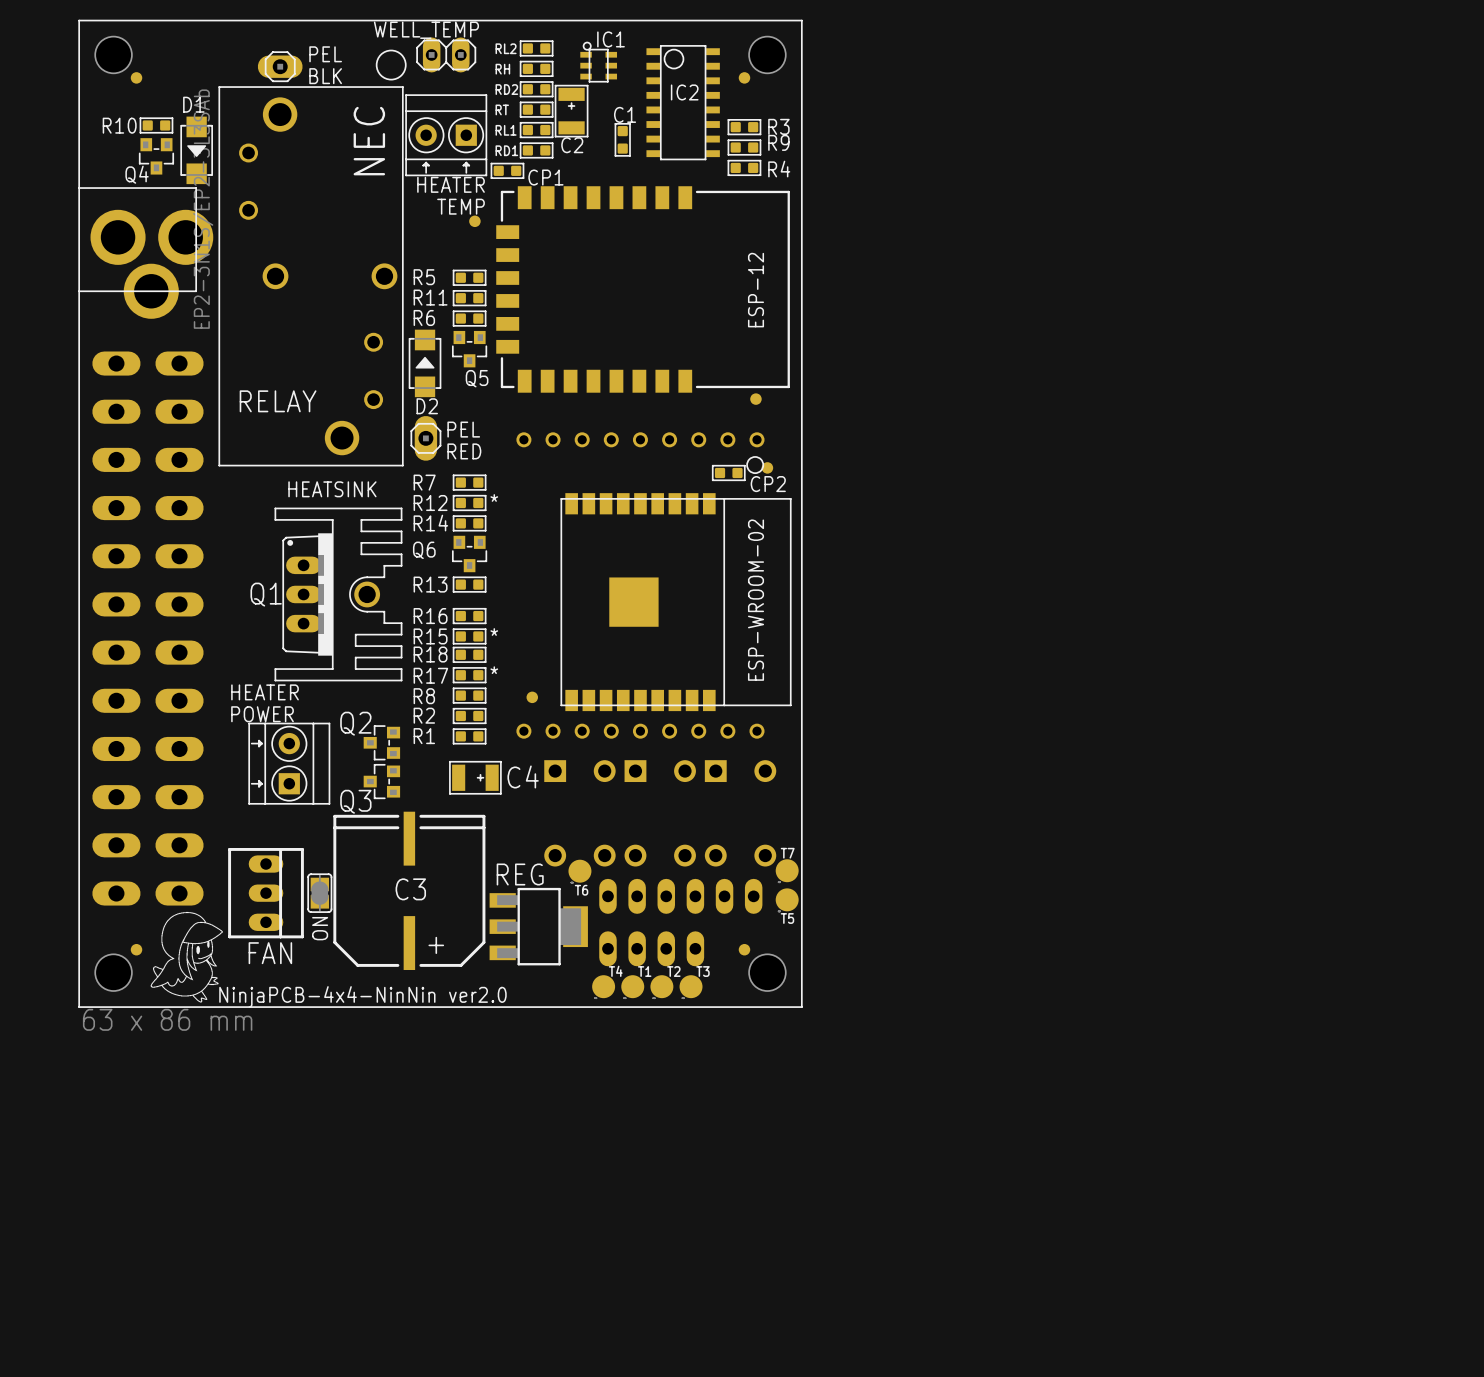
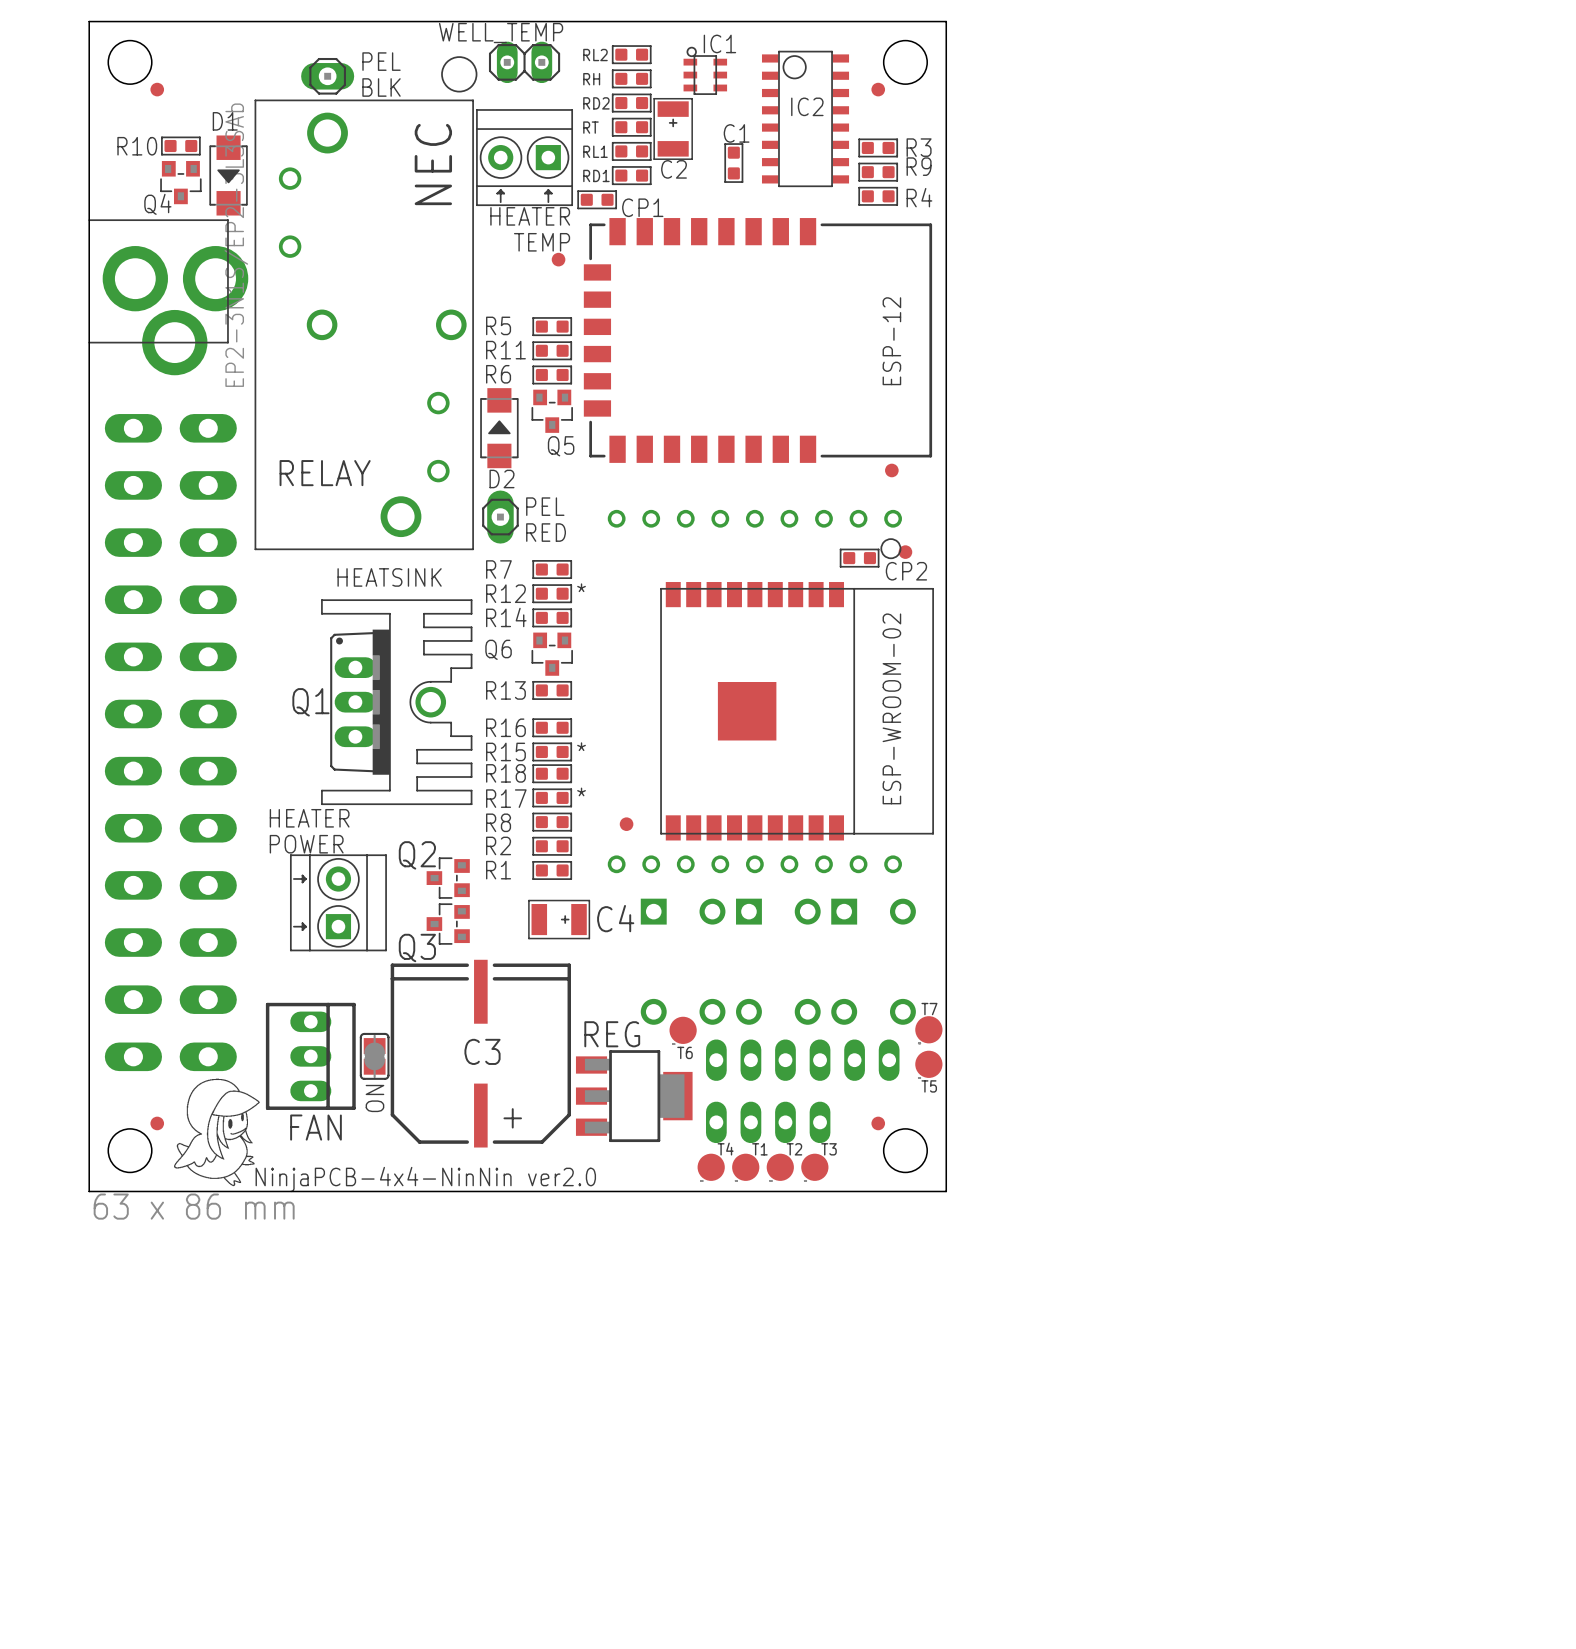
line: (79, 20) (801, 20) (801, 1007) (79, 1007) (79, 20) -> none
board edge: none -> (89, 21) (946, 21) (946, 1191) (89, 1191) (89, 21)

